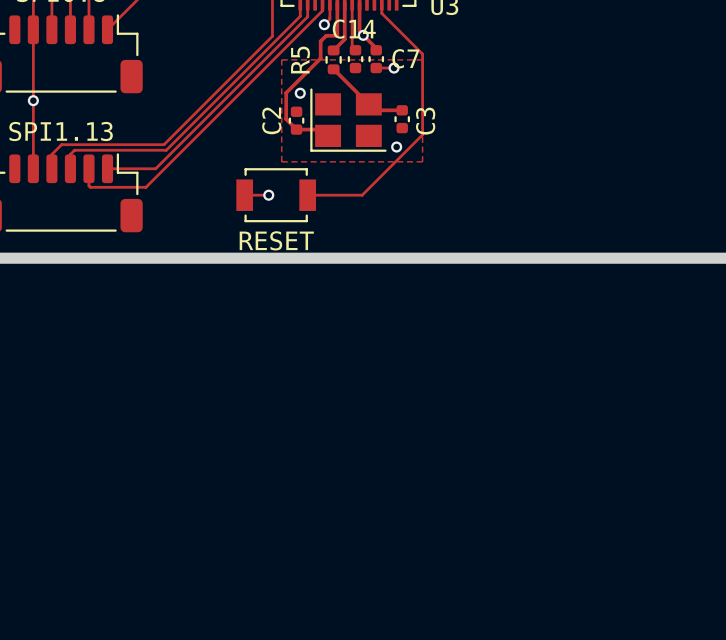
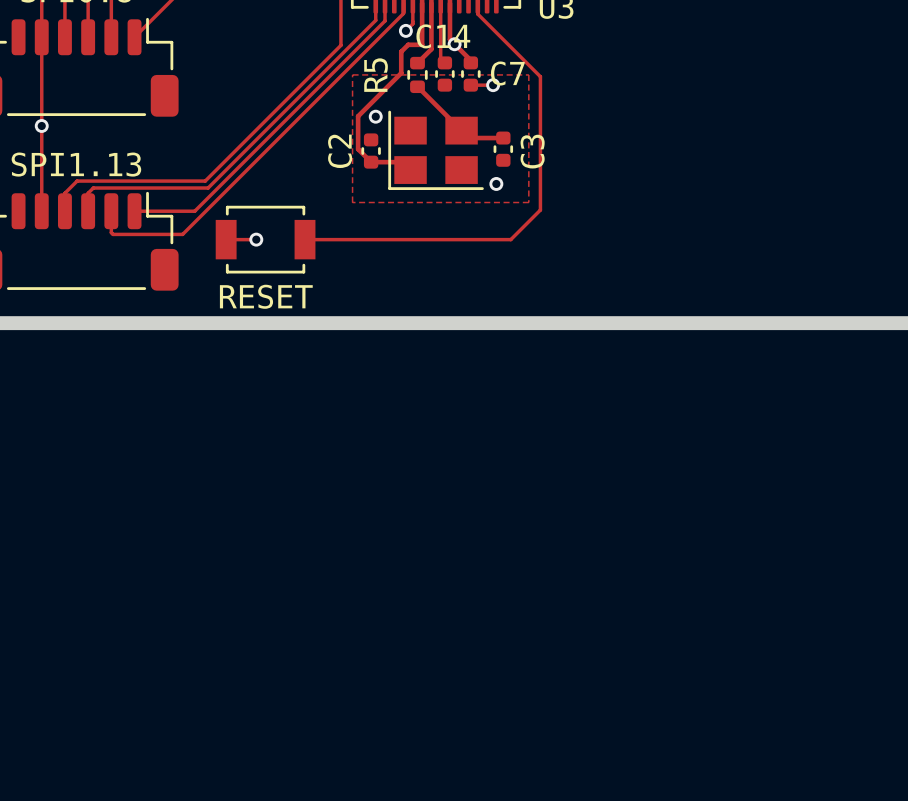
track: (381, 11) (422, 54) (422, 134) (362, 195) (307, 195) -> (477, 14) (540, 76) (540, 210) (510, 239) (305, 239)
track: (244, 195) (268, 195) -> (226, 239) (256, 239)
via position: (268, 195) -> (256, 239)
part position: (276, 195) -> (265, 239)

